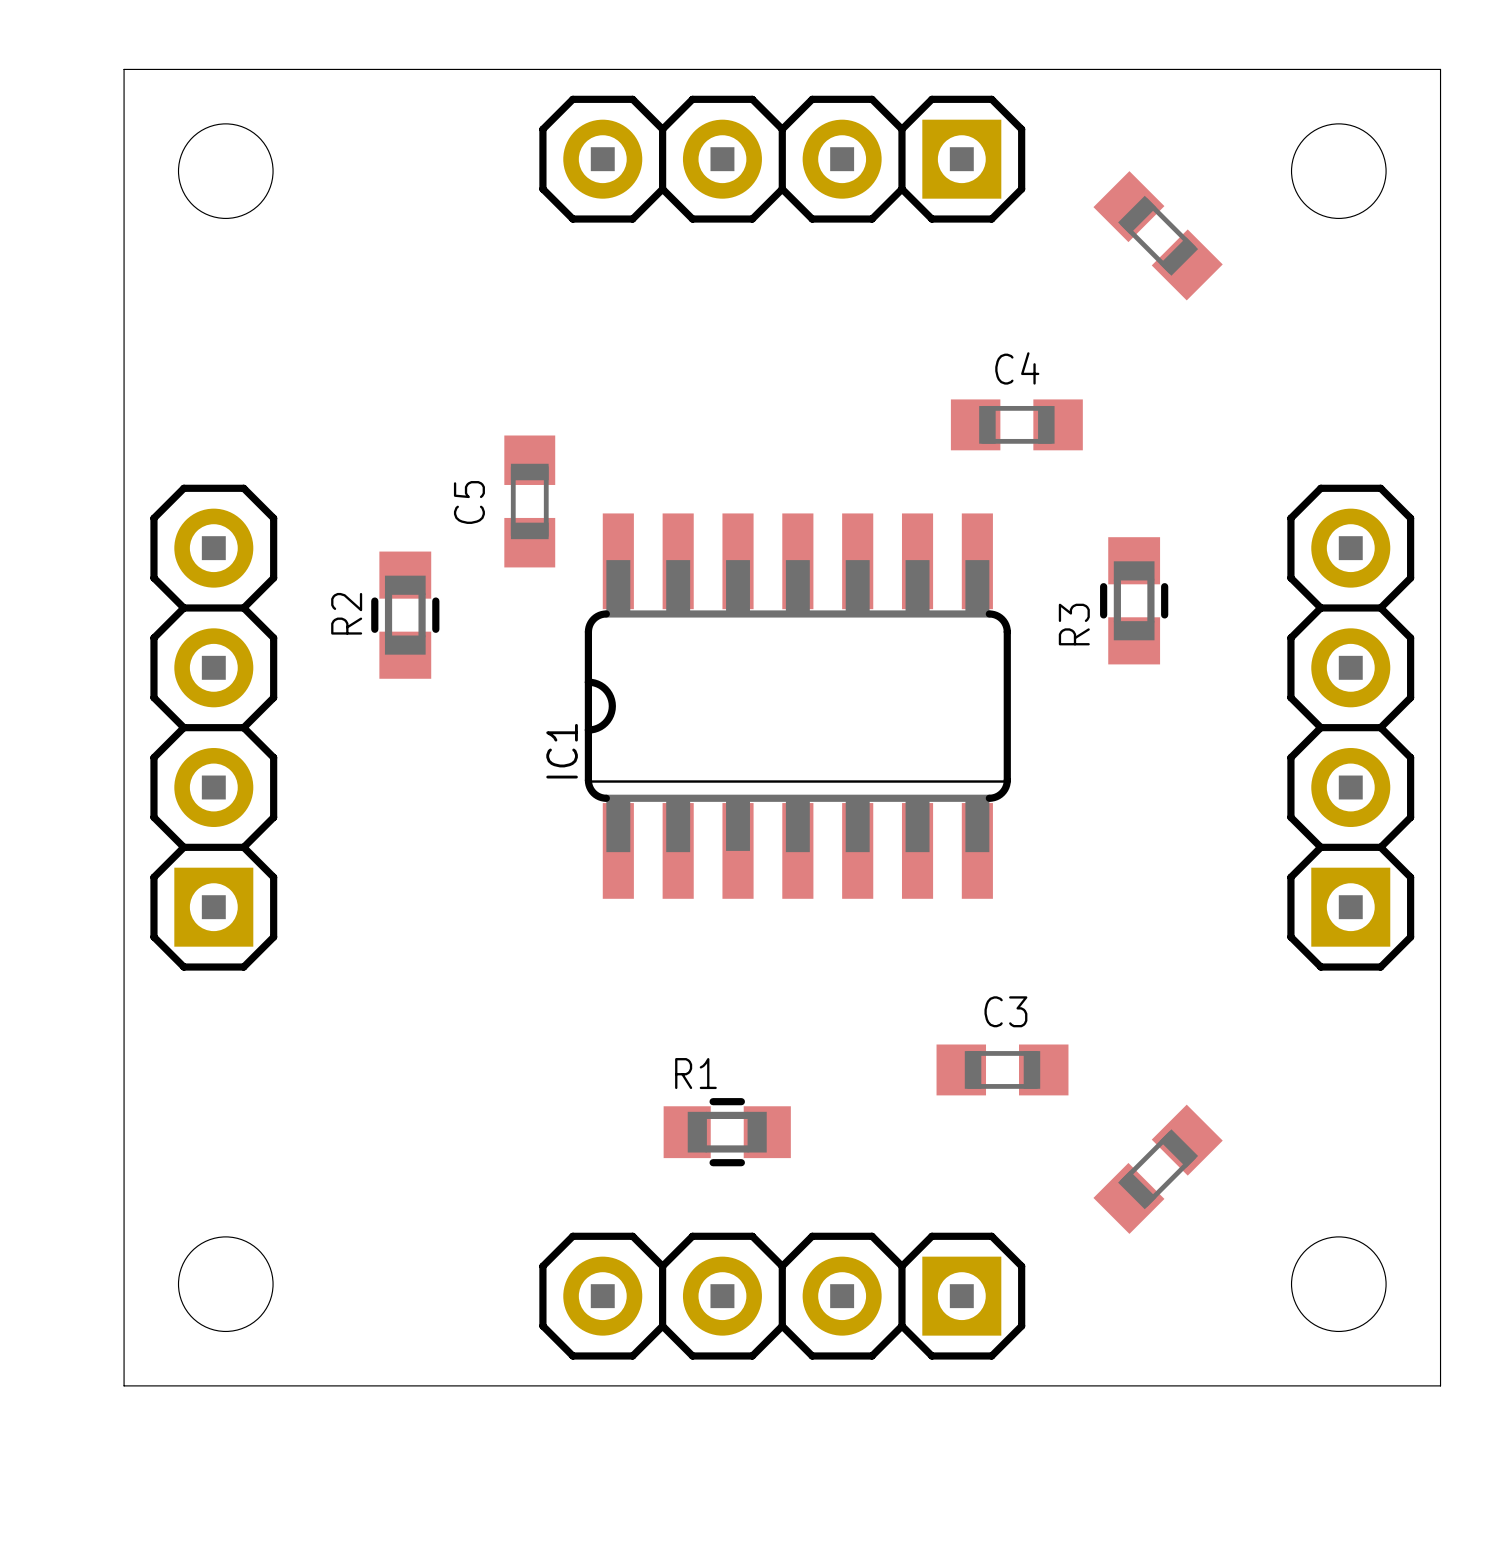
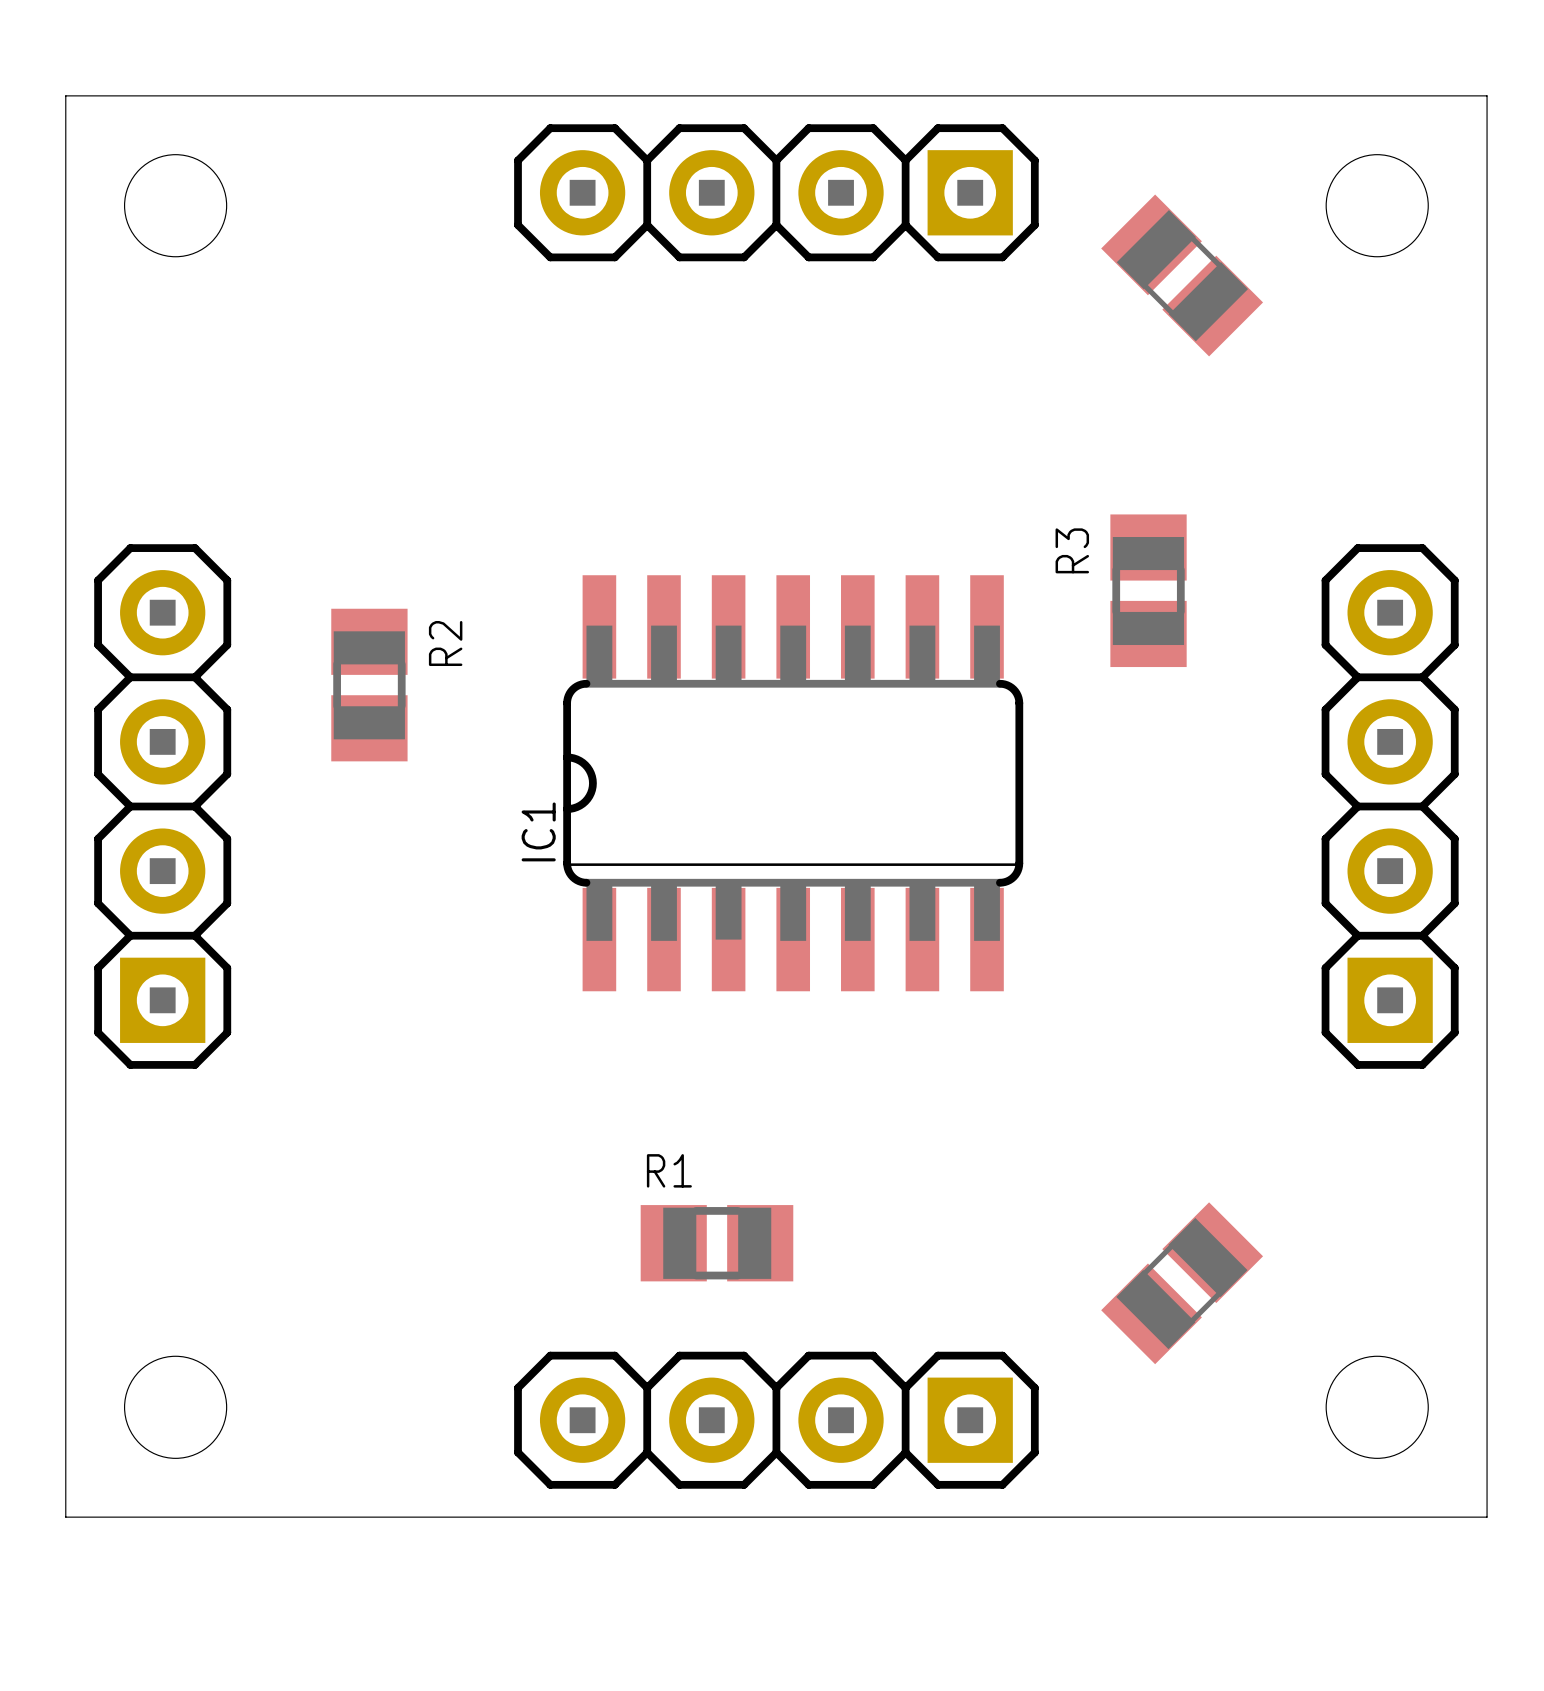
part footprint: [1093, 171, 1223, 301] -> [1101, 194, 1264, 357]
C4: (1016, 424) -> none
C5: (529, 501) -> none
R3 footprint: [1100, 537, 1169, 665] -> [1110, 514, 1187, 668]
R2 footprint: [371, 551, 440, 679] -> [331, 608, 408, 762]
R2 name position: R2 (346, 613) -> R2 (445, 643)
C3: (1002, 1069) -> none
R1 footprint: [663, 1098, 791, 1167] -> [640, 1205, 794, 1282]
part footprint: [1093, 1104, 1223, 1234] -> [1101, 1202, 1264, 1365]

